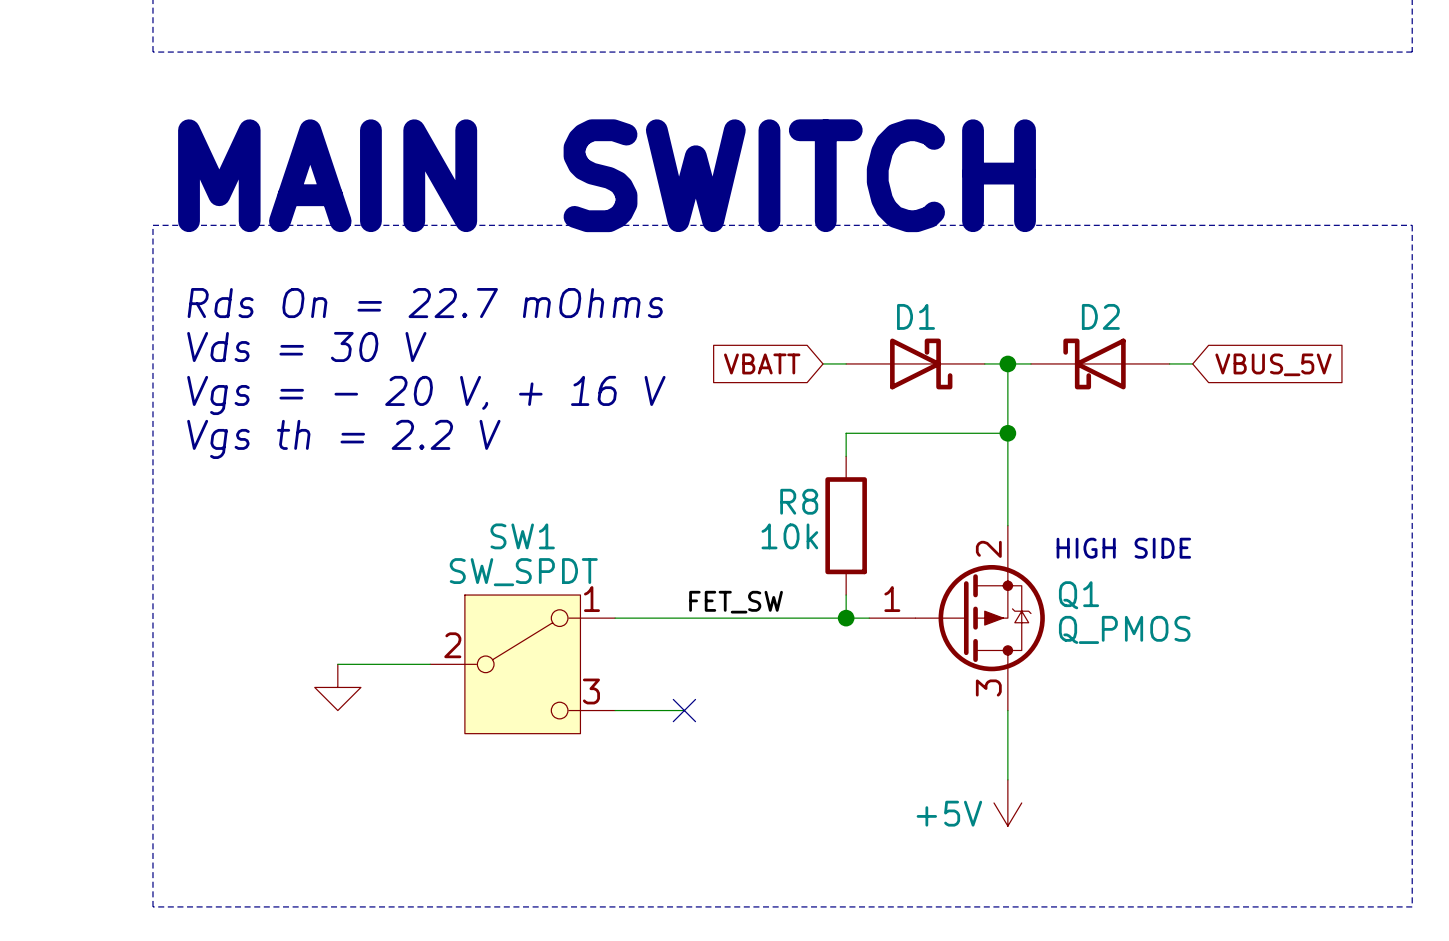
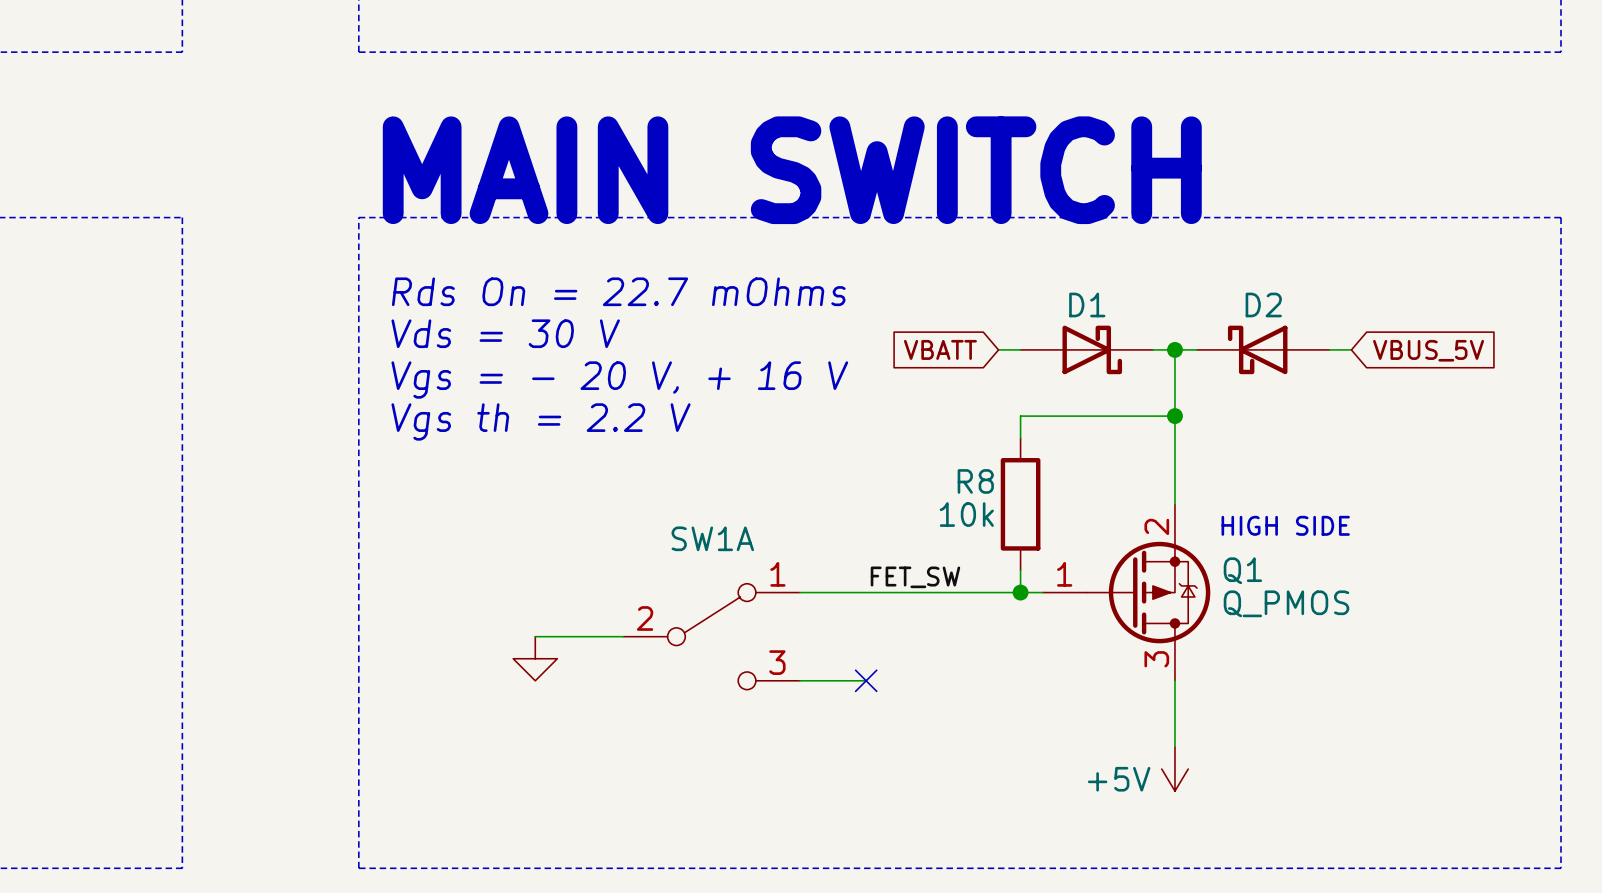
SW1: SW_SPDT (522, 664) -> none
SW1A: none -> (711, 636)

